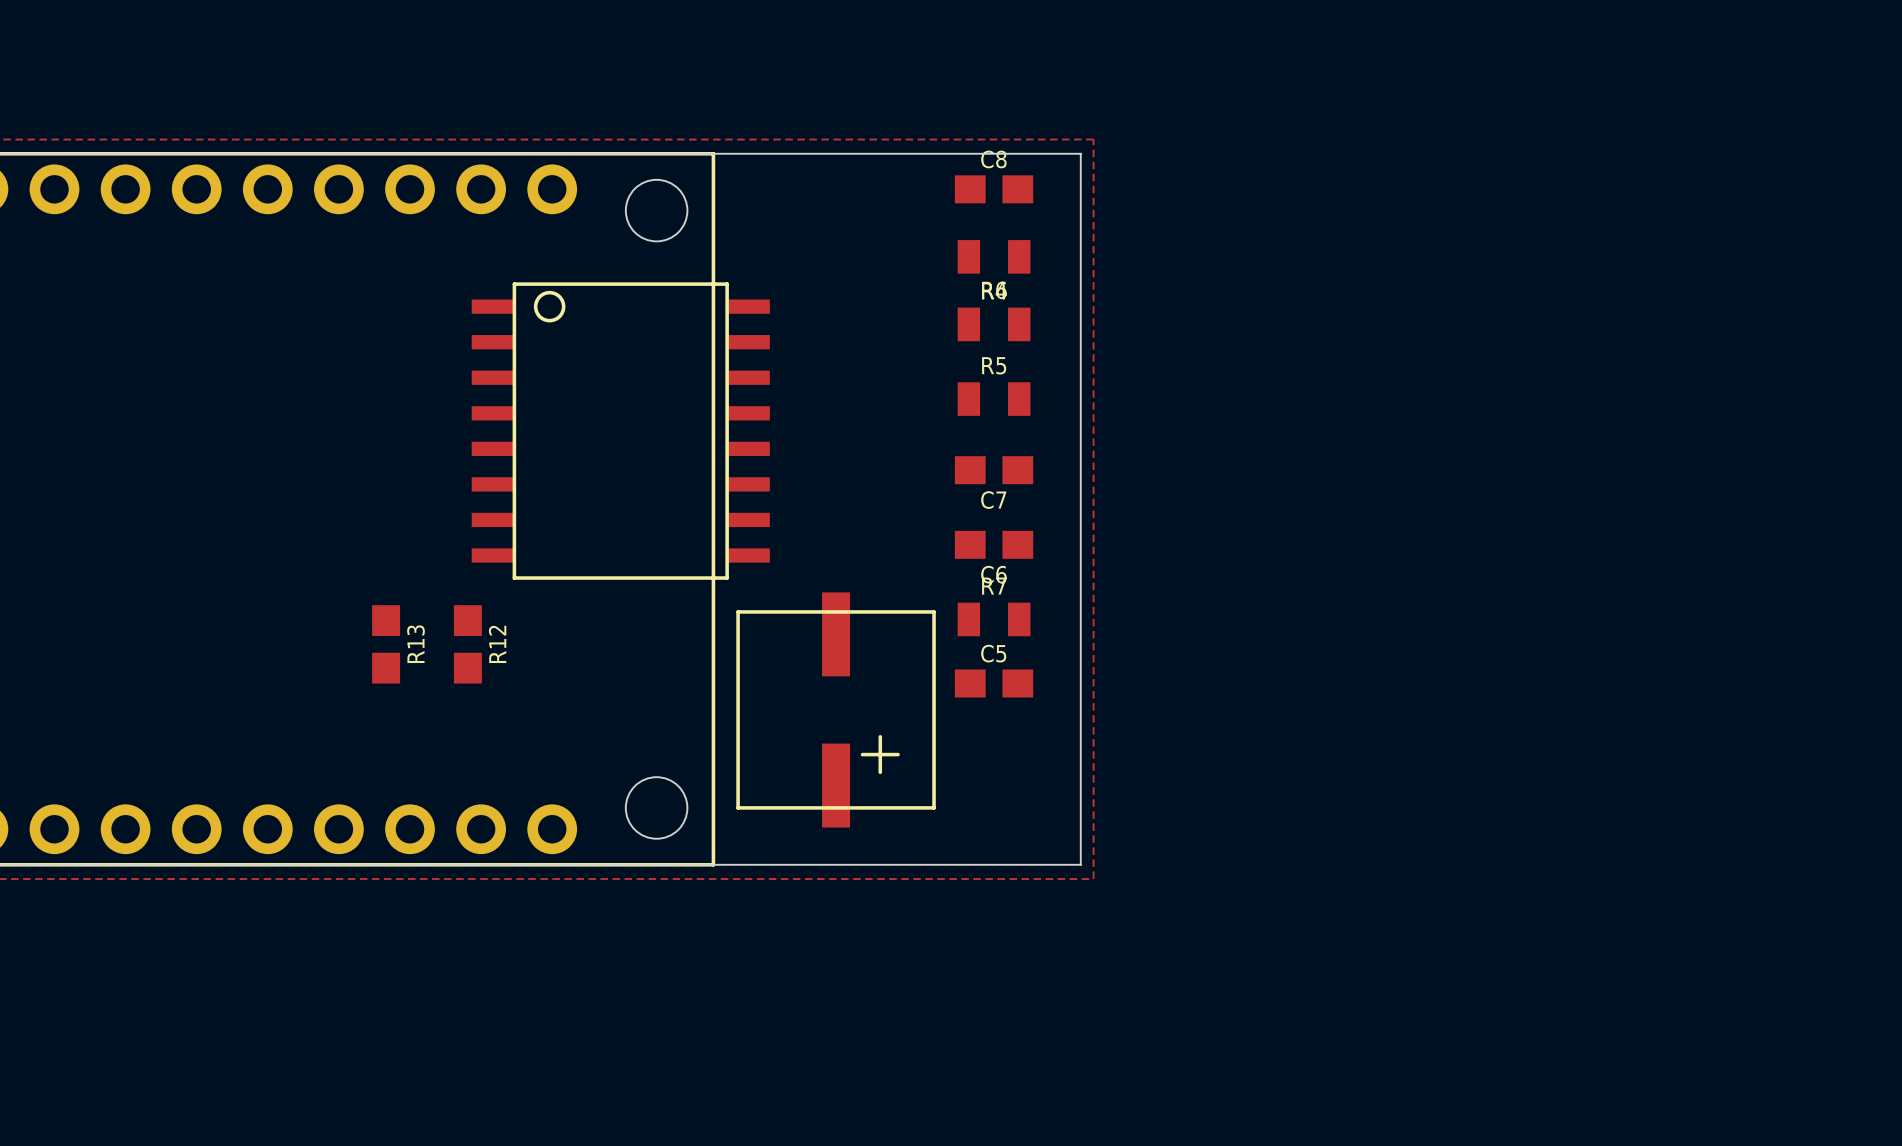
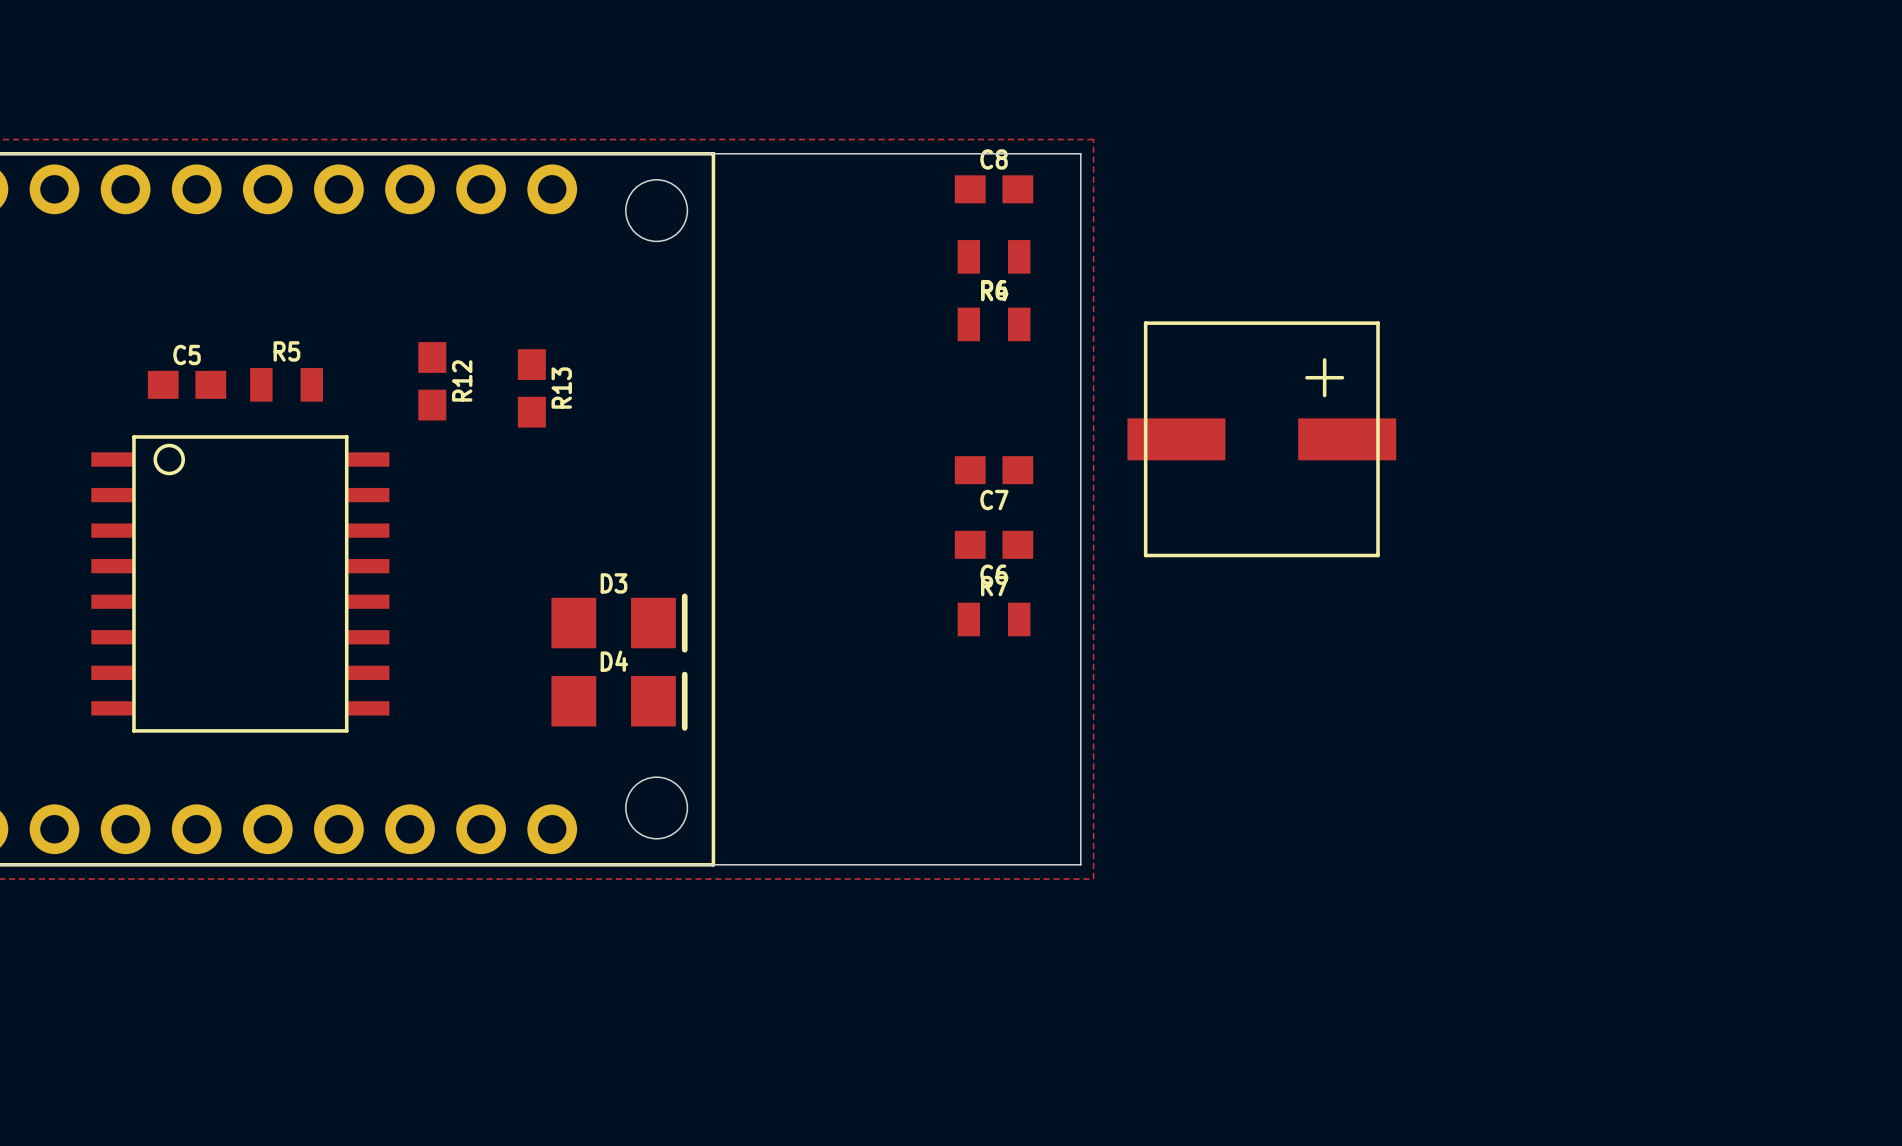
R5 position: (994, 399) -> (286, 384)
part position: (620, 431) -> (240, 583)
part: none -> (1261, 439)
D3: none -> (619, 623)
R13 position: (386, 644) -> (531, 388)
R12 position: (467, 644) -> (432, 381)
C5 position: (994, 683) -> (187, 384)
D4: none -> (619, 701)
part: (836, 709) -> none

